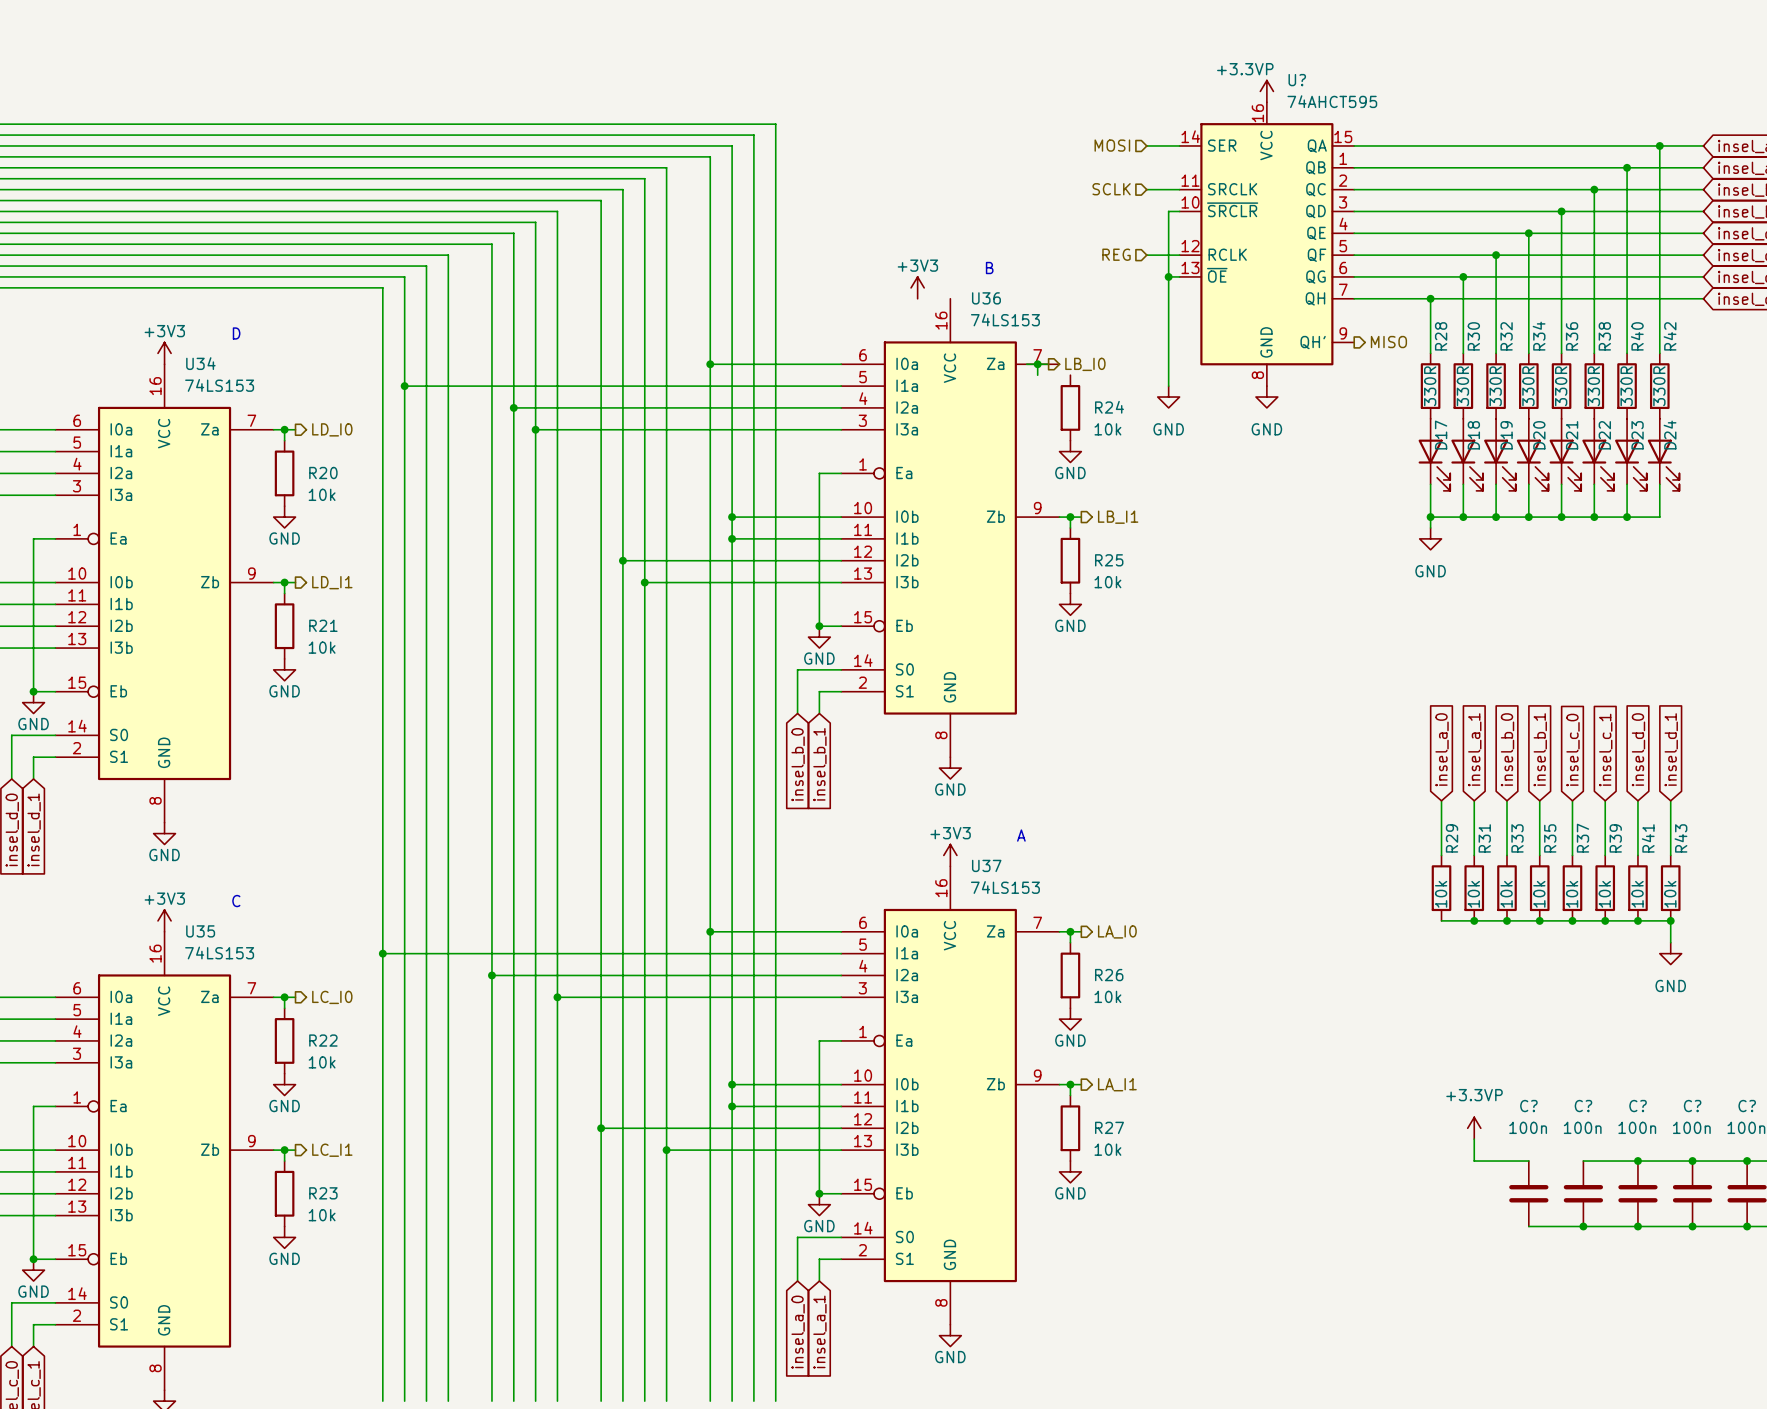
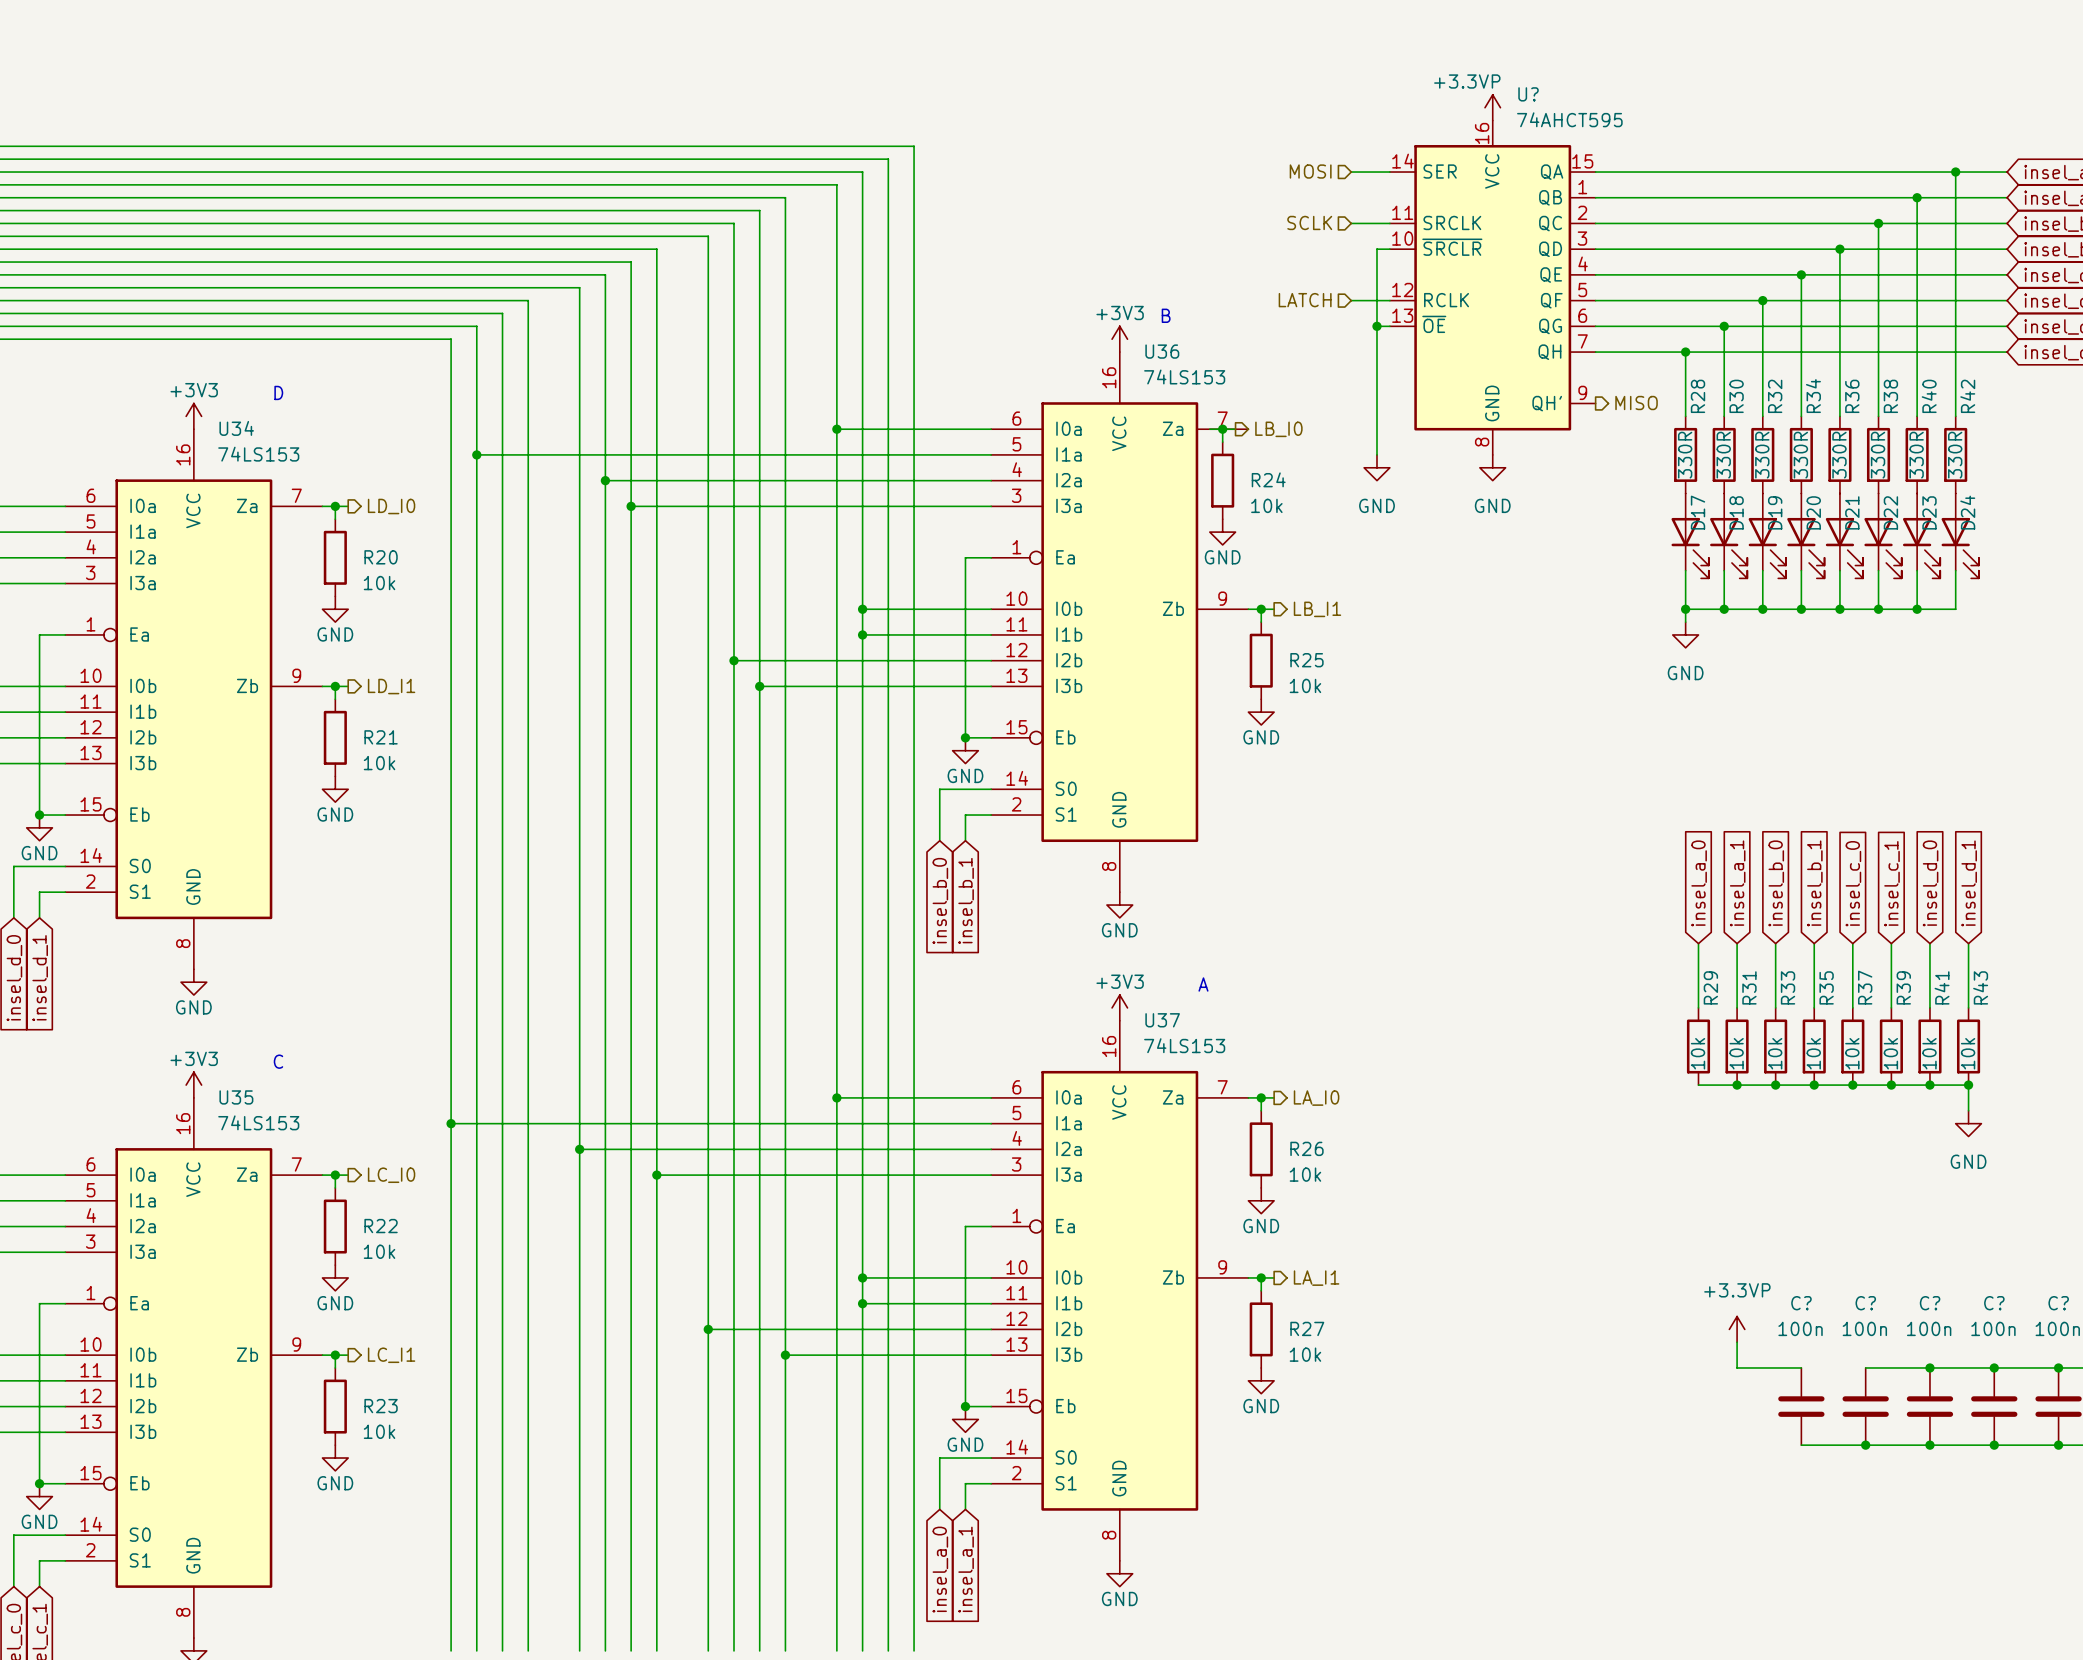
hierarchical label: REG (1116, 254) -> LATCH (1305, 300)
power symbol position: +3V3 (917, 287) -> +3V3 (1119, 339)
R24 position: (1070, 407) -> (1222, 480)
power symbol position: GND (1070, 451) -> GND (1222, 532)

